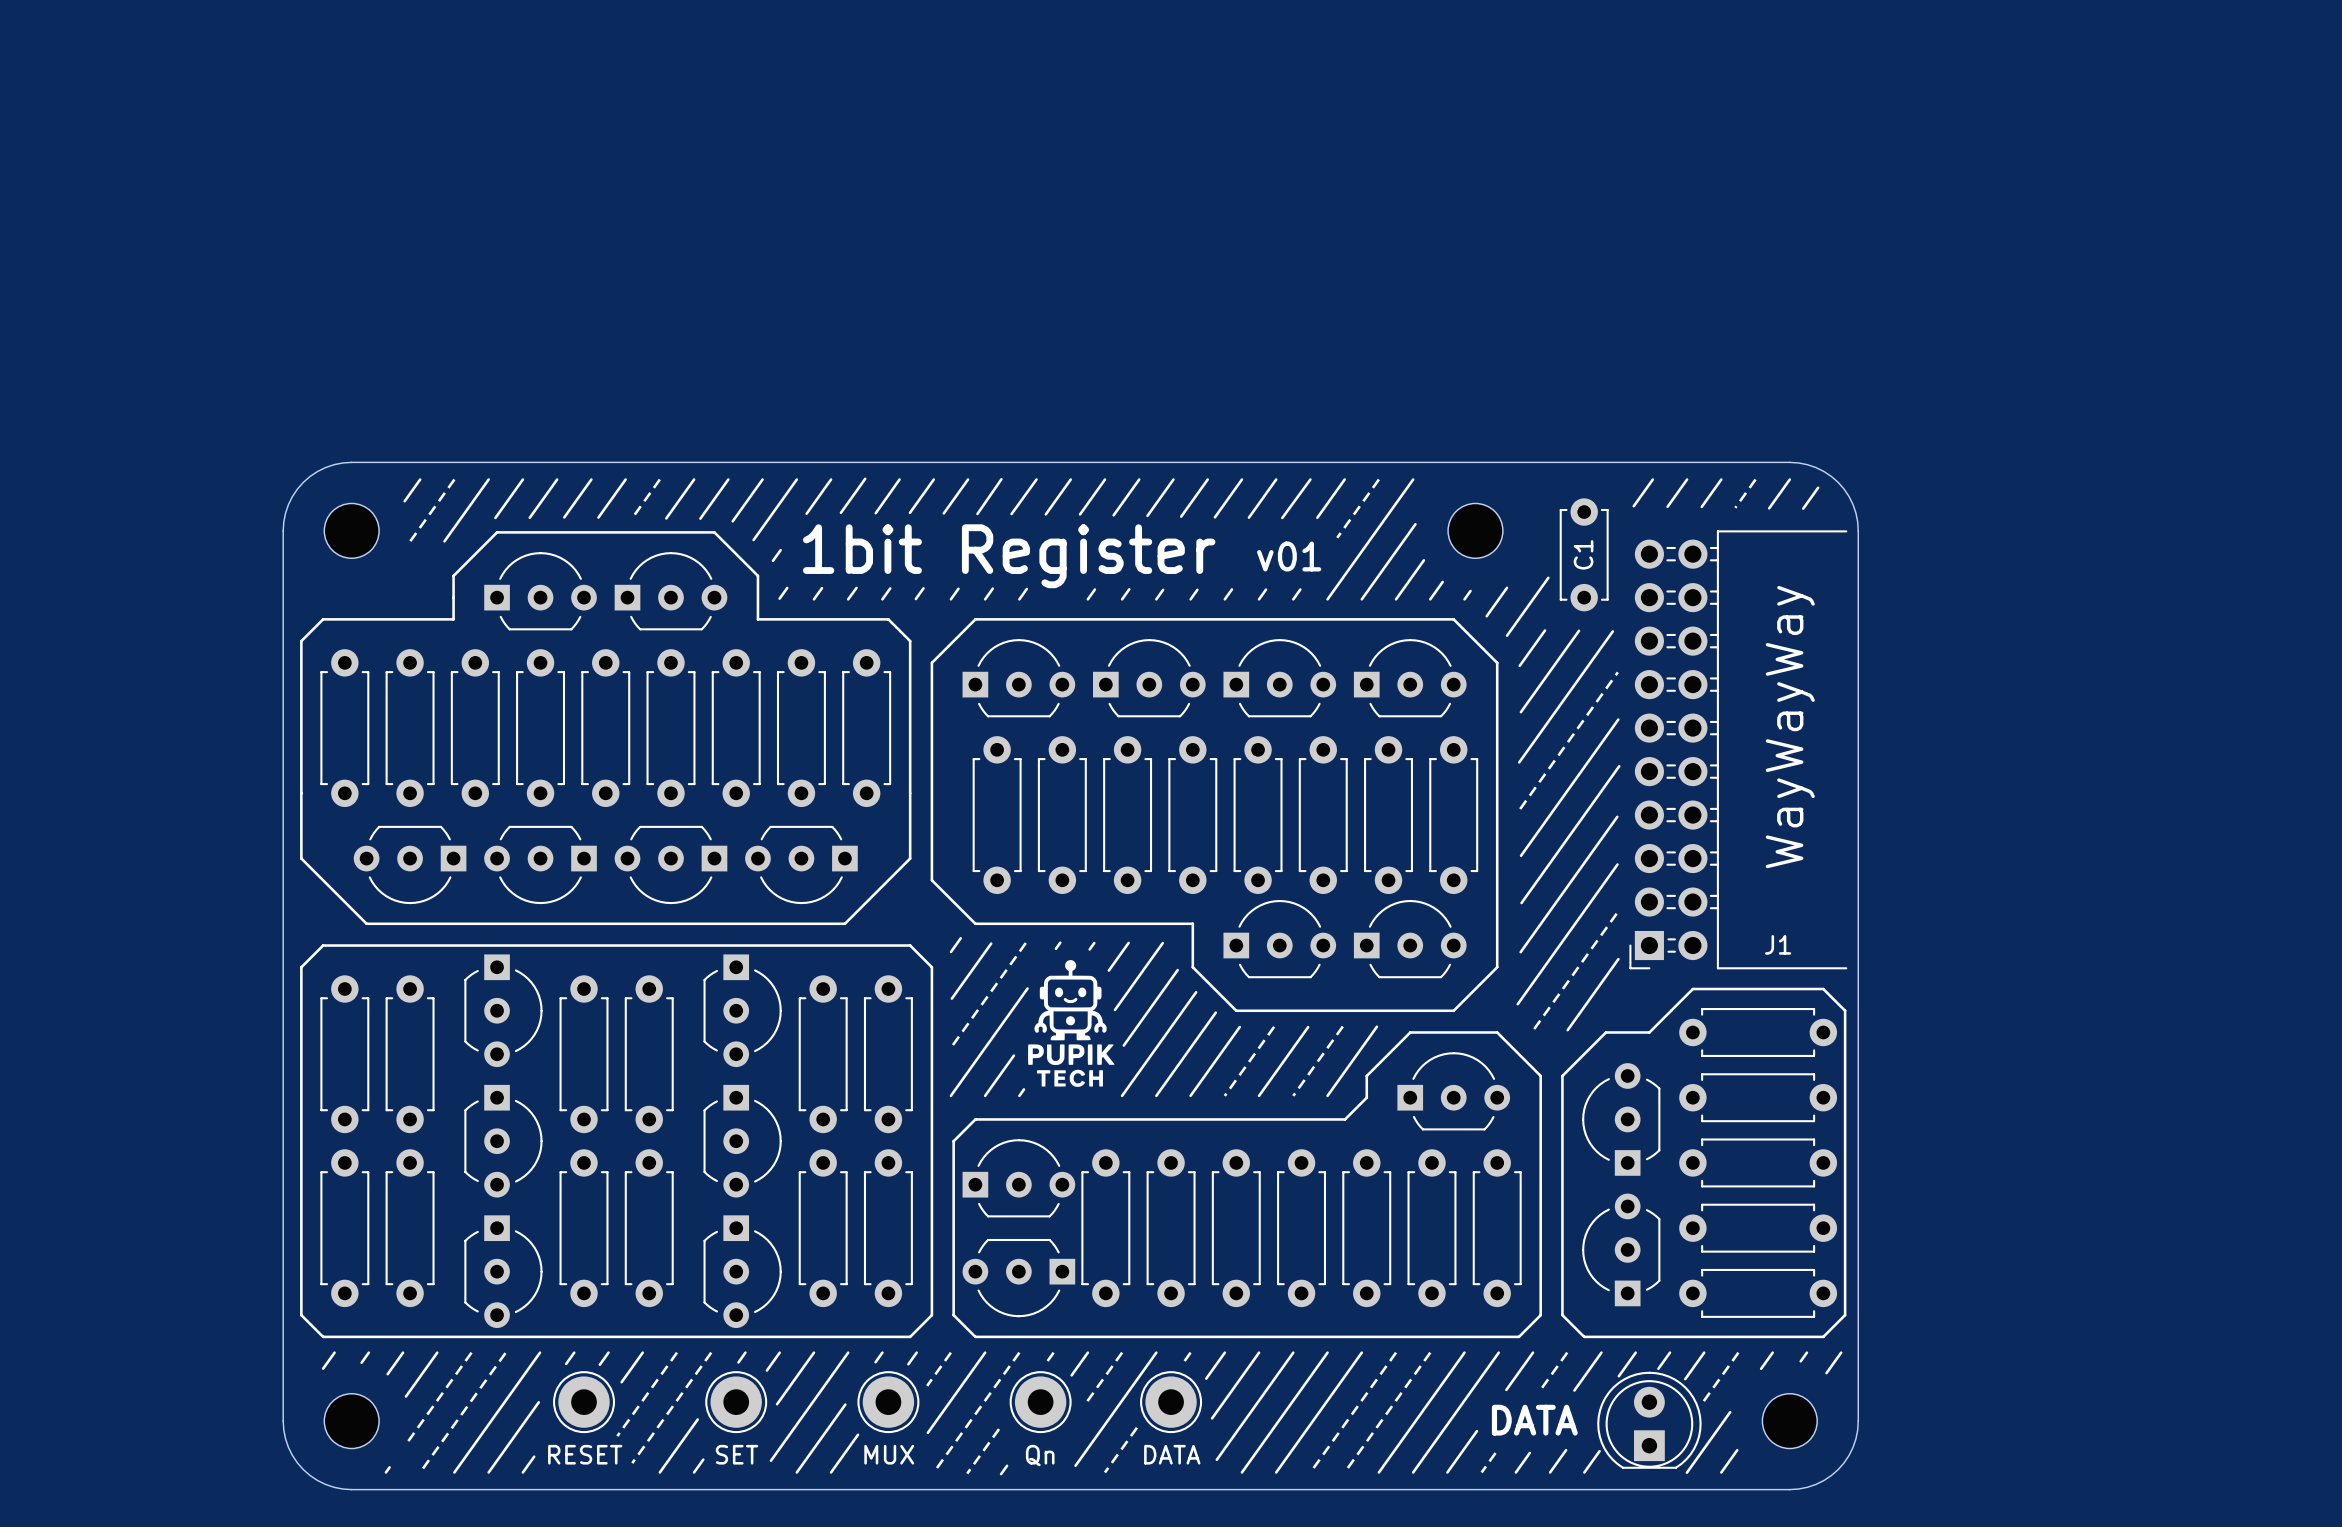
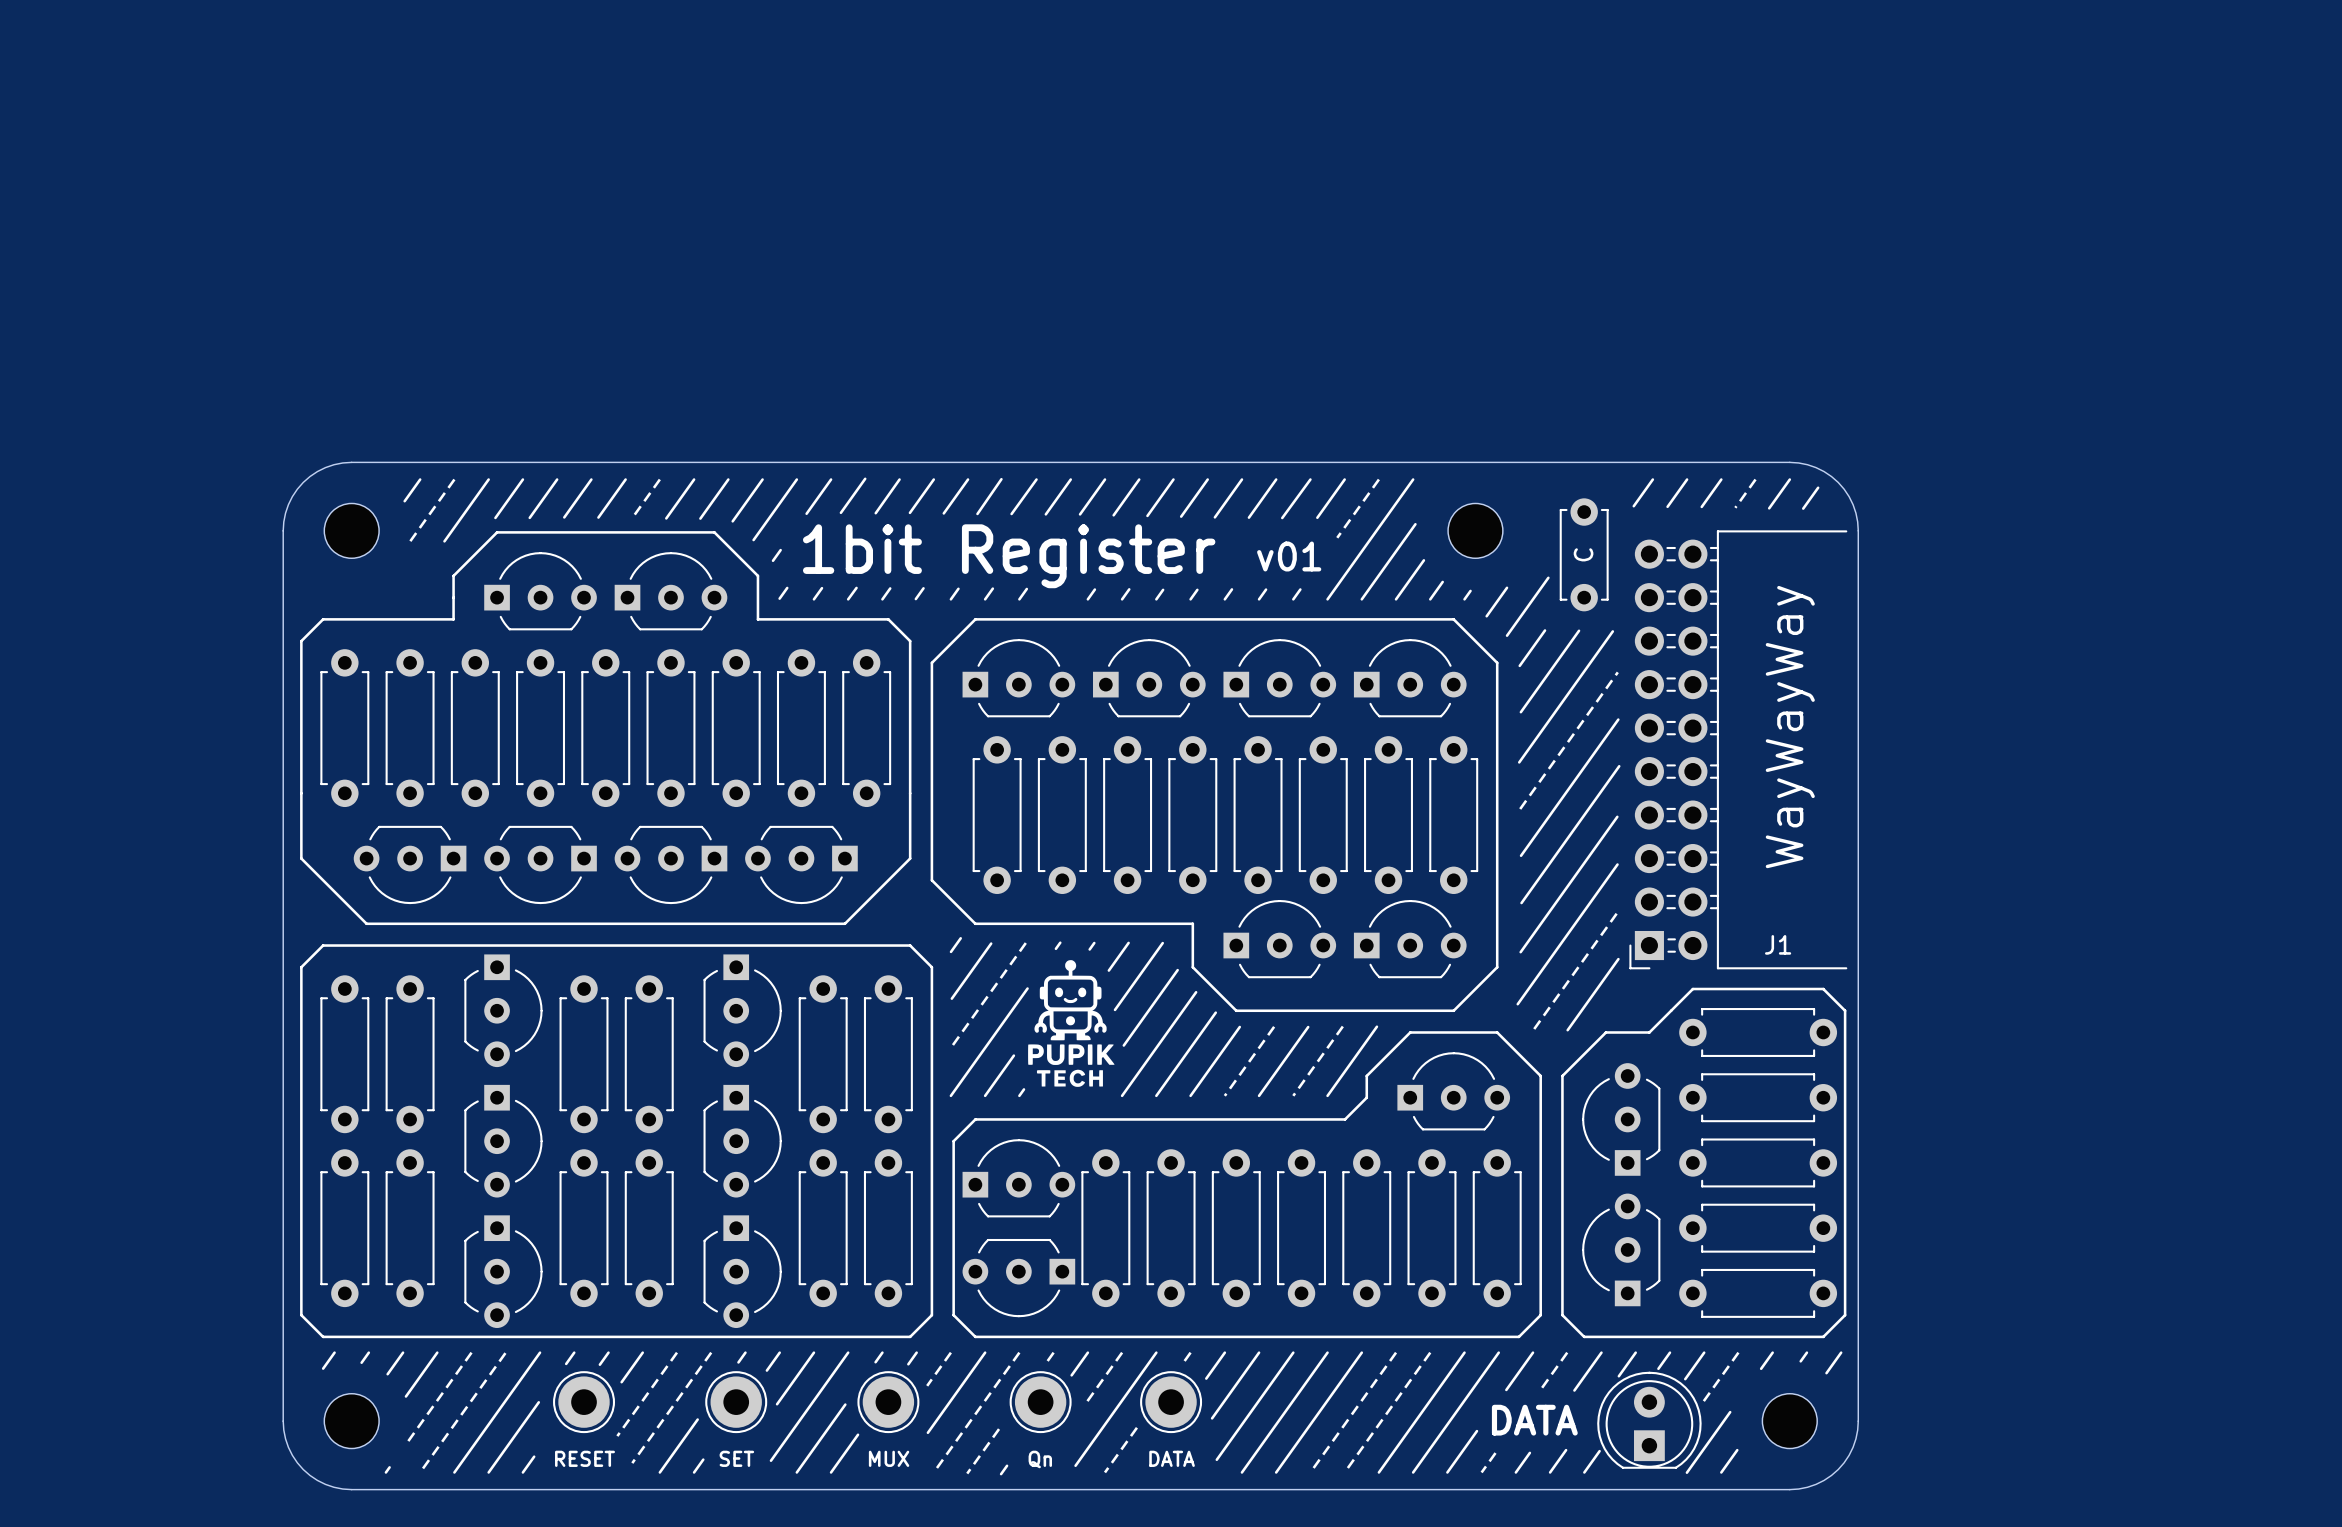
C1 name: C1 (1583, 554) -> C (1583, 554)
RESET name: RESET (585, 1454) -> none
SET name: SET (737, 1454) -> none
MUX name: MUX (889, 1454) -> none
DATA name: DATA (1172, 1454) -> none
Qn name: Qn (1040, 1455) -> none
text: none -> RESET (584, 1458)
text: none -> SET (736, 1458)
text: none -> MUX (889, 1458)
text: none -> DATA (1172, 1458)
text: none -> Qn (1040, 1459)

